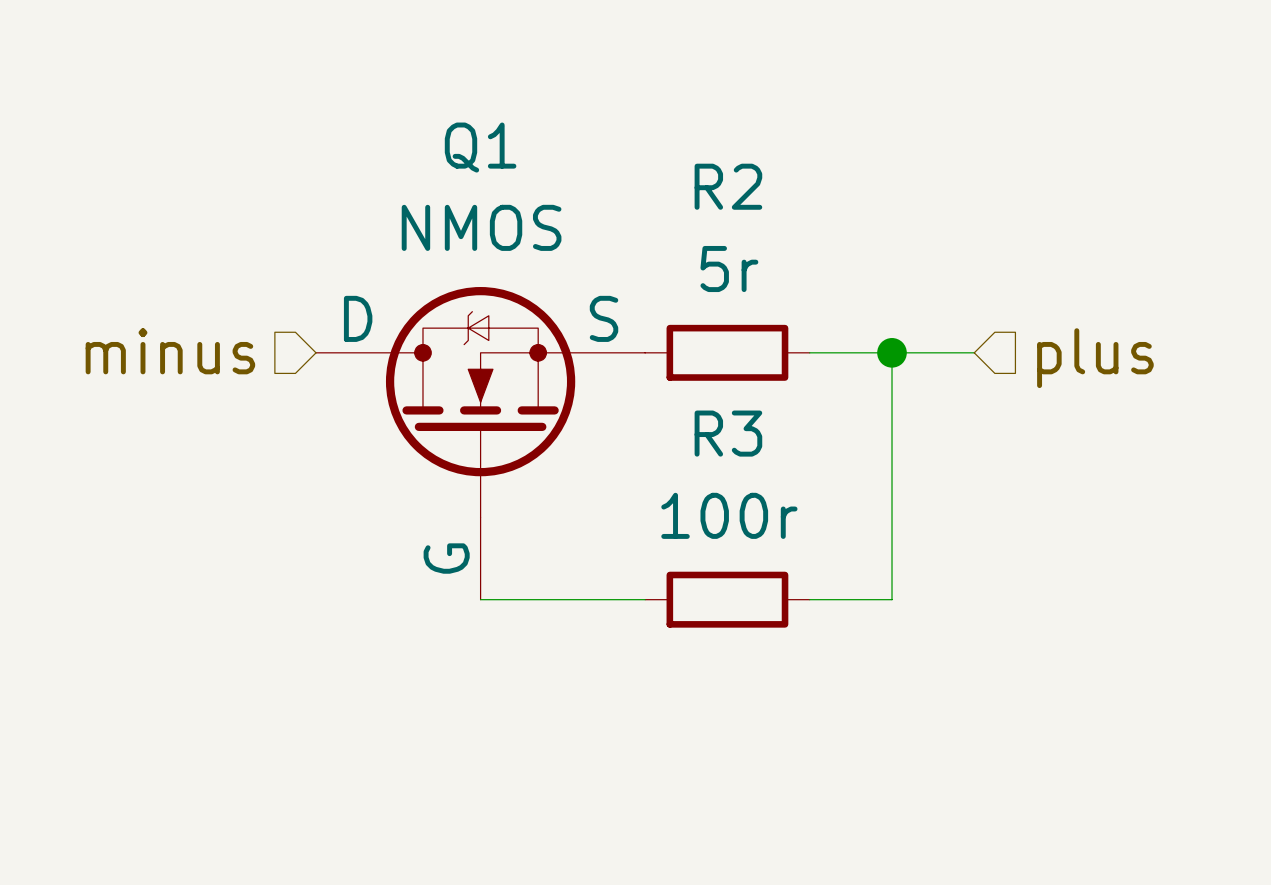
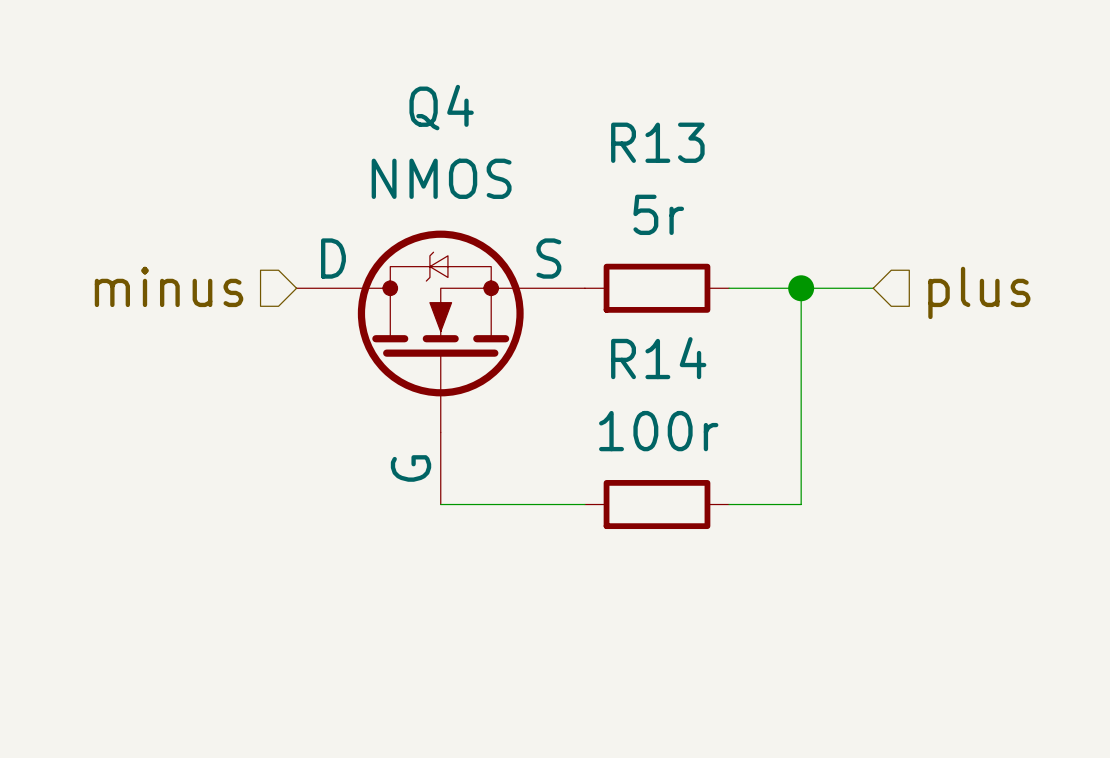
Q1 name: Q1 (480, 147) -> Q4 (441, 107)
R2 name: R2 (728, 186) -> R13 (657, 142)
R3 name: R3 (728, 433) -> R14 (658, 358)

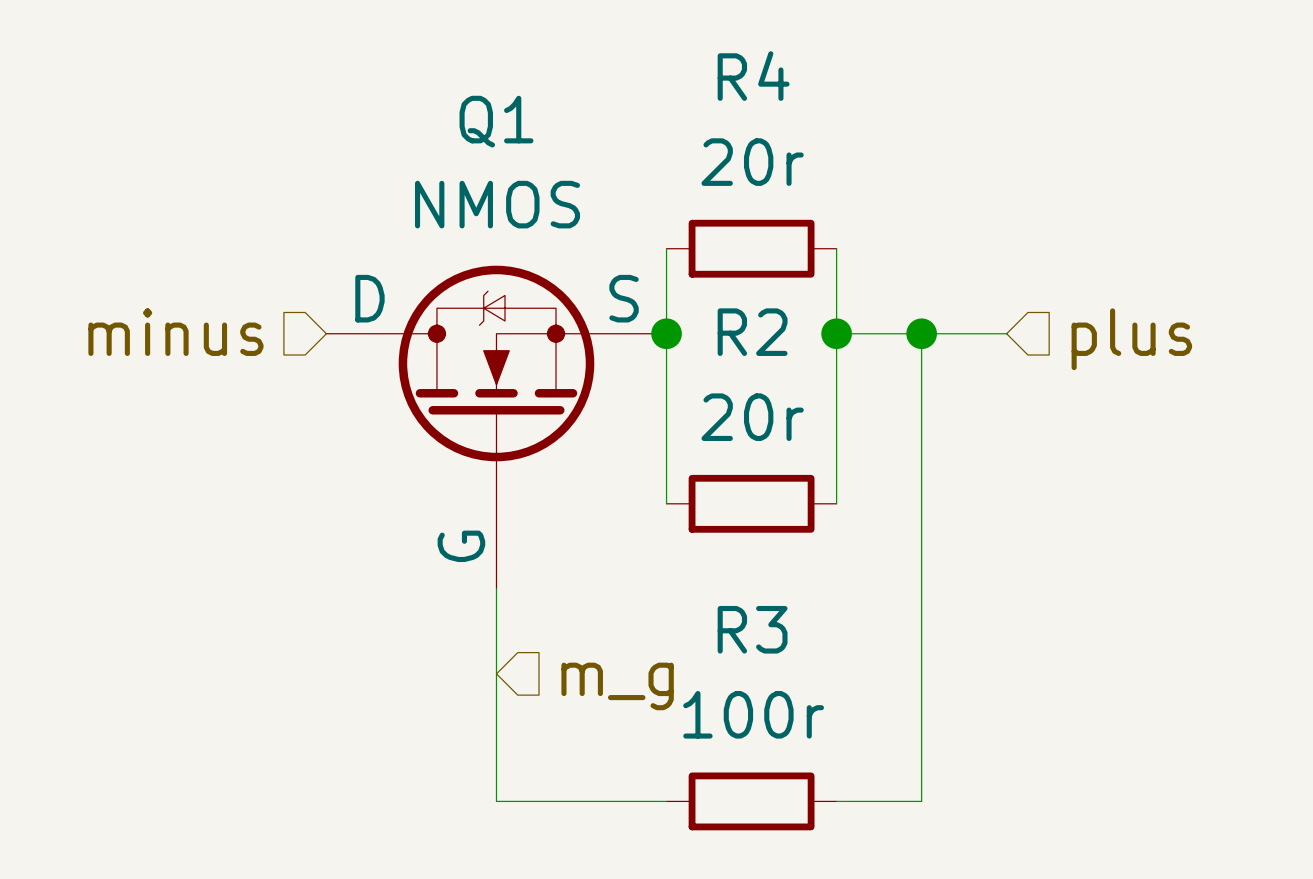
Q4 name: Q4 (441, 107) -> Q1 (496, 121)
wire: none -> (666, 248) (666, 503)
R4: none -> 20r (751, 248)
wire: none -> (836, 248) (836, 503)
junction: none -> (666, 333)
R13: 5r (657, 288) -> none
junction: none -> (836, 333)
R2: none -> 20r (751, 503)
wire: (440, 504) (584, 504) -> (496, 588) (496, 801) (666, 801)
R14: 100r (657, 504) -> none
wire: (729, 504) (801, 504) -> (836, 801) (921, 801) (921, 588)
hierarchical label: none -> m_g (617, 686)
R3: none -> 100r (751, 801)

